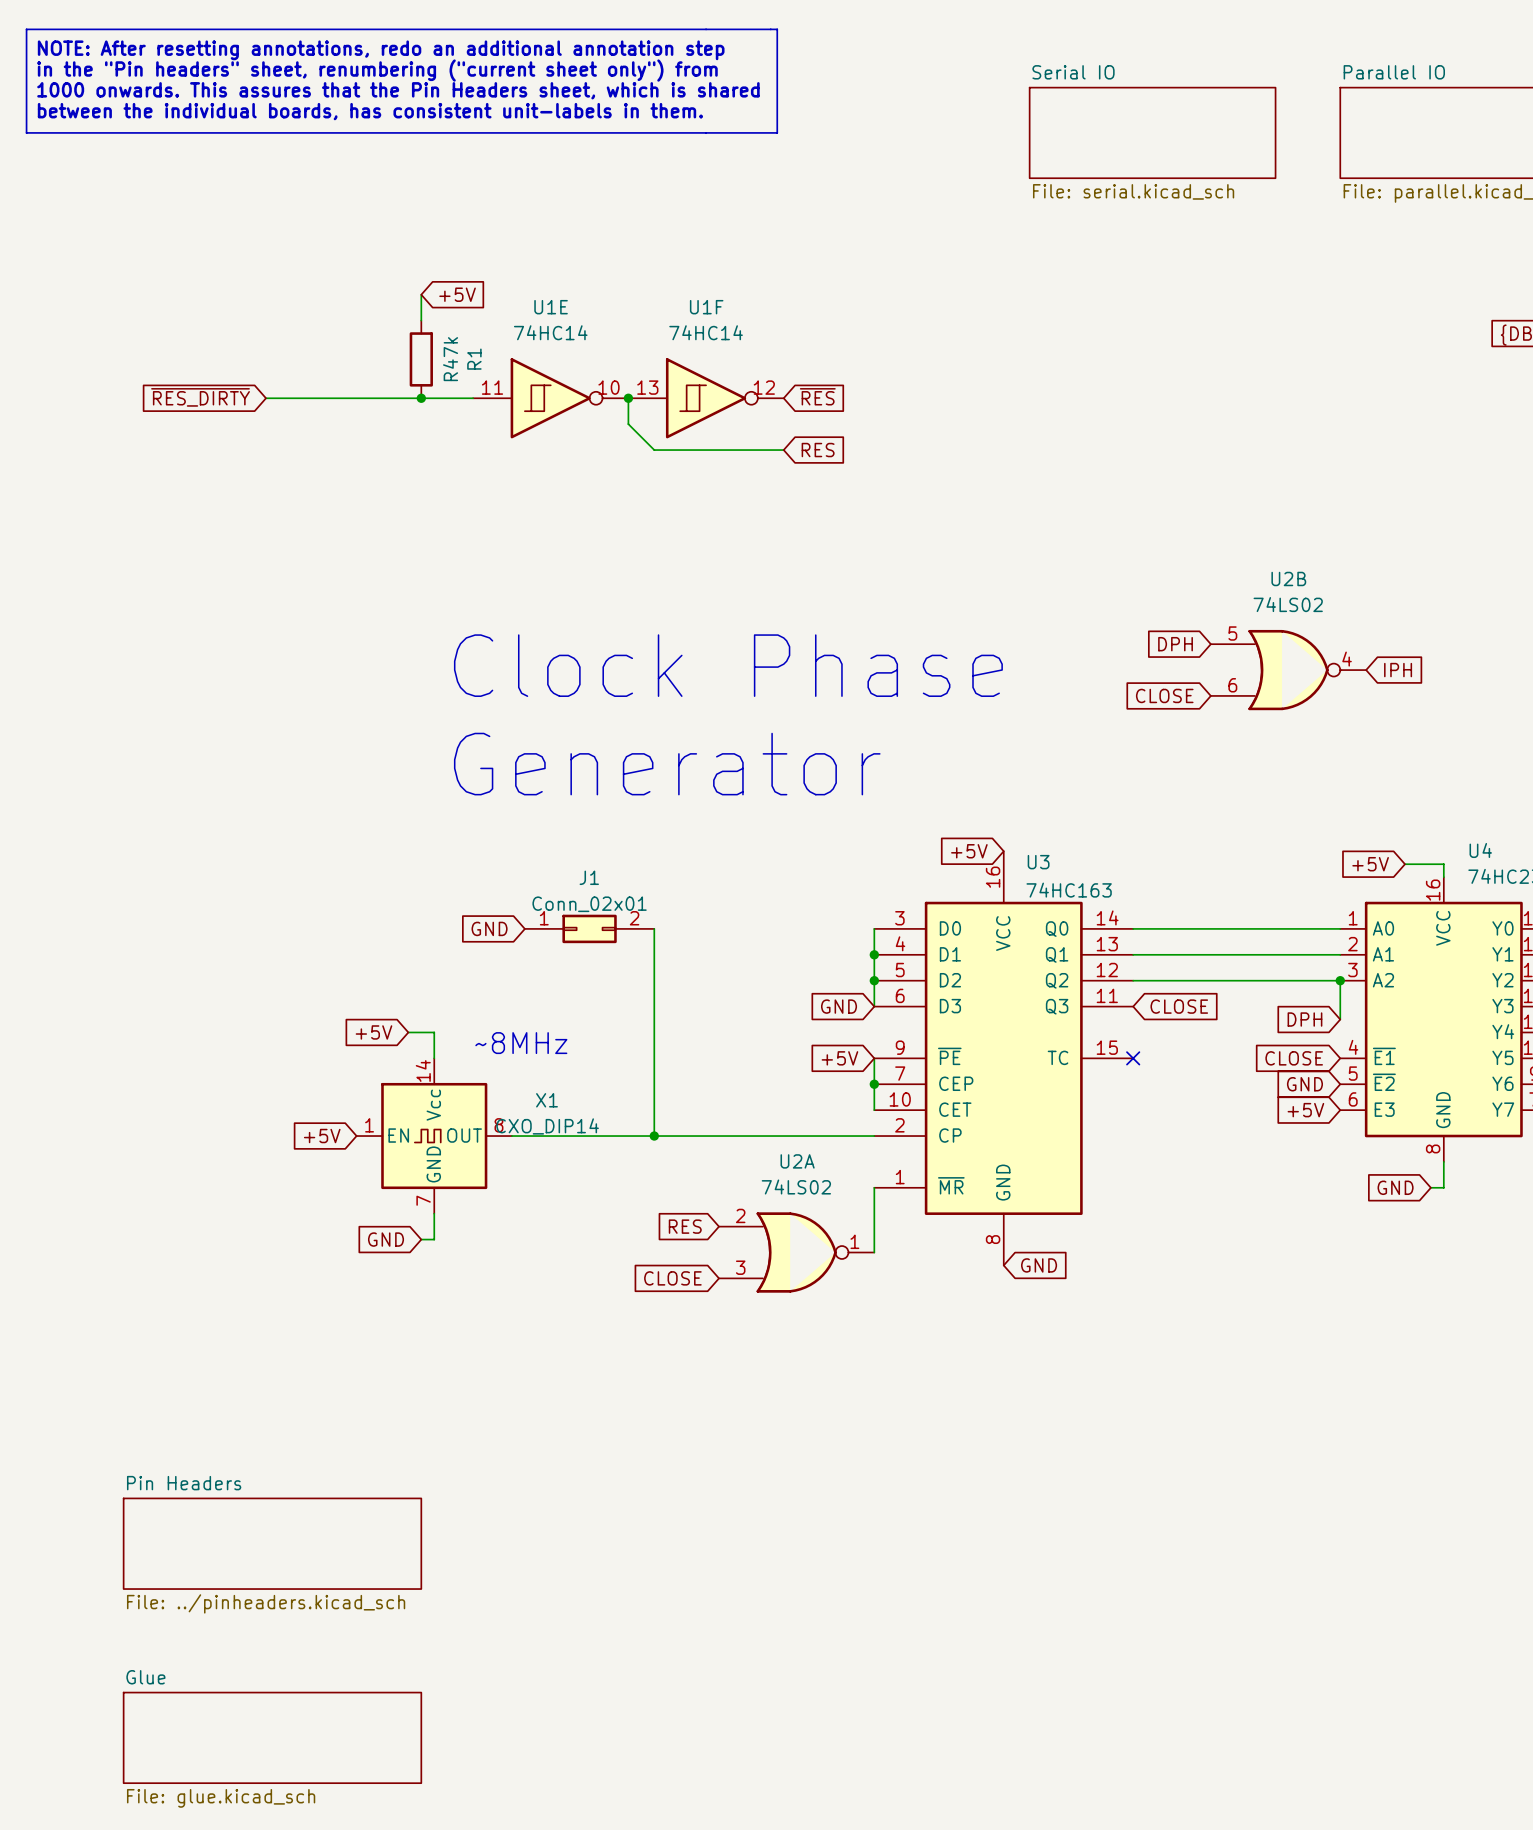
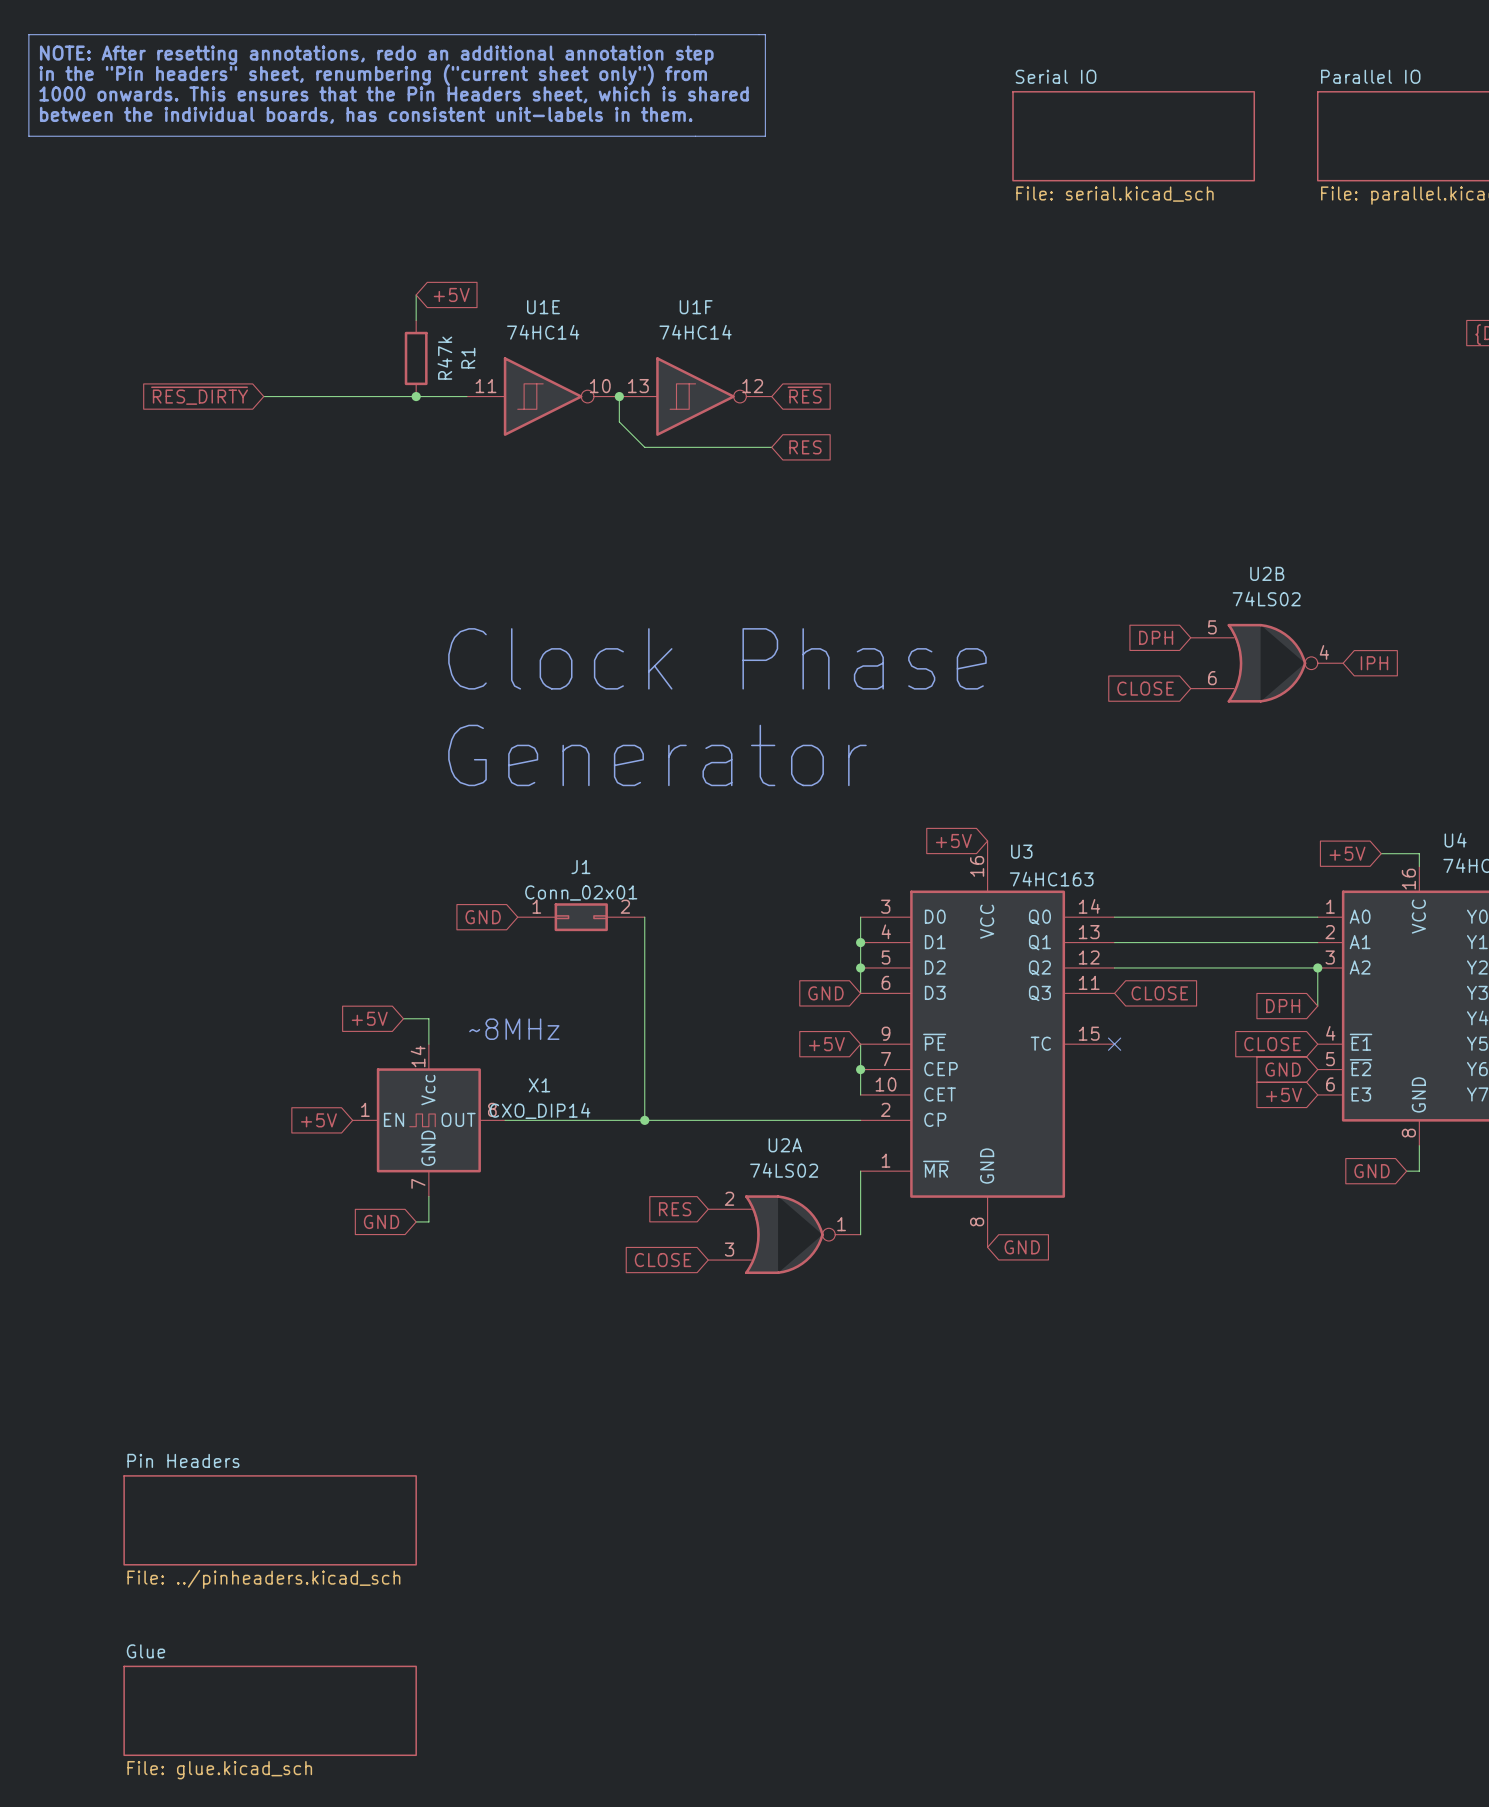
text: 1000 onwards. This assures that the Pin Headers sheet, which is shared (398, 90) -> 1000 onwards. This ensures that the Pin Headers sheet, which is shared (394, 94)

